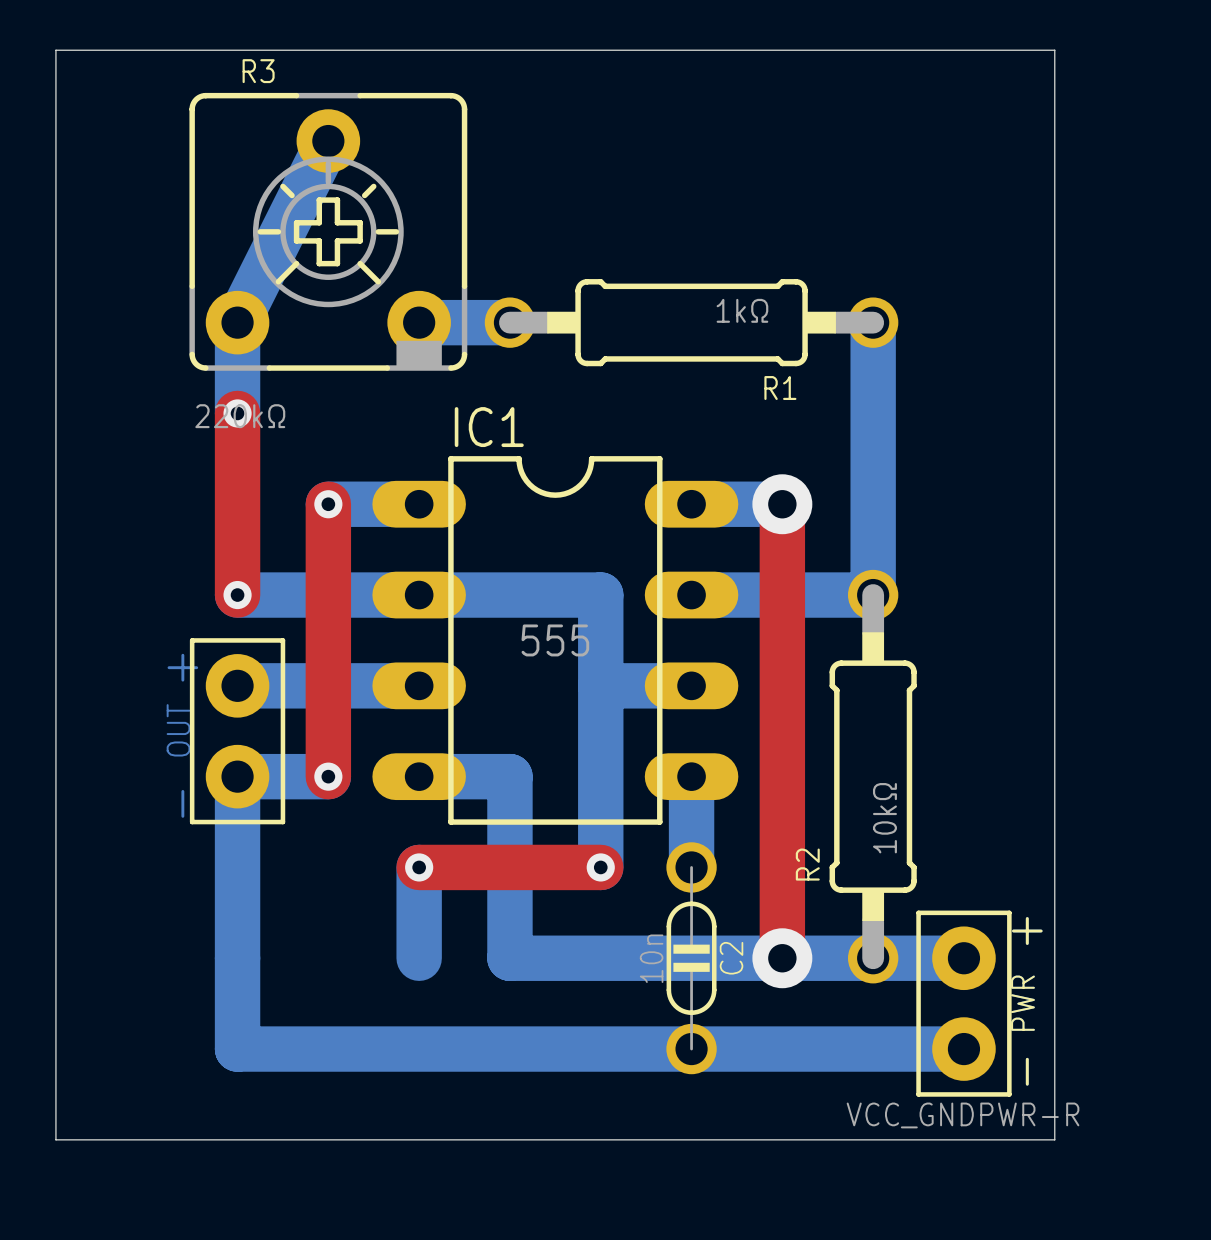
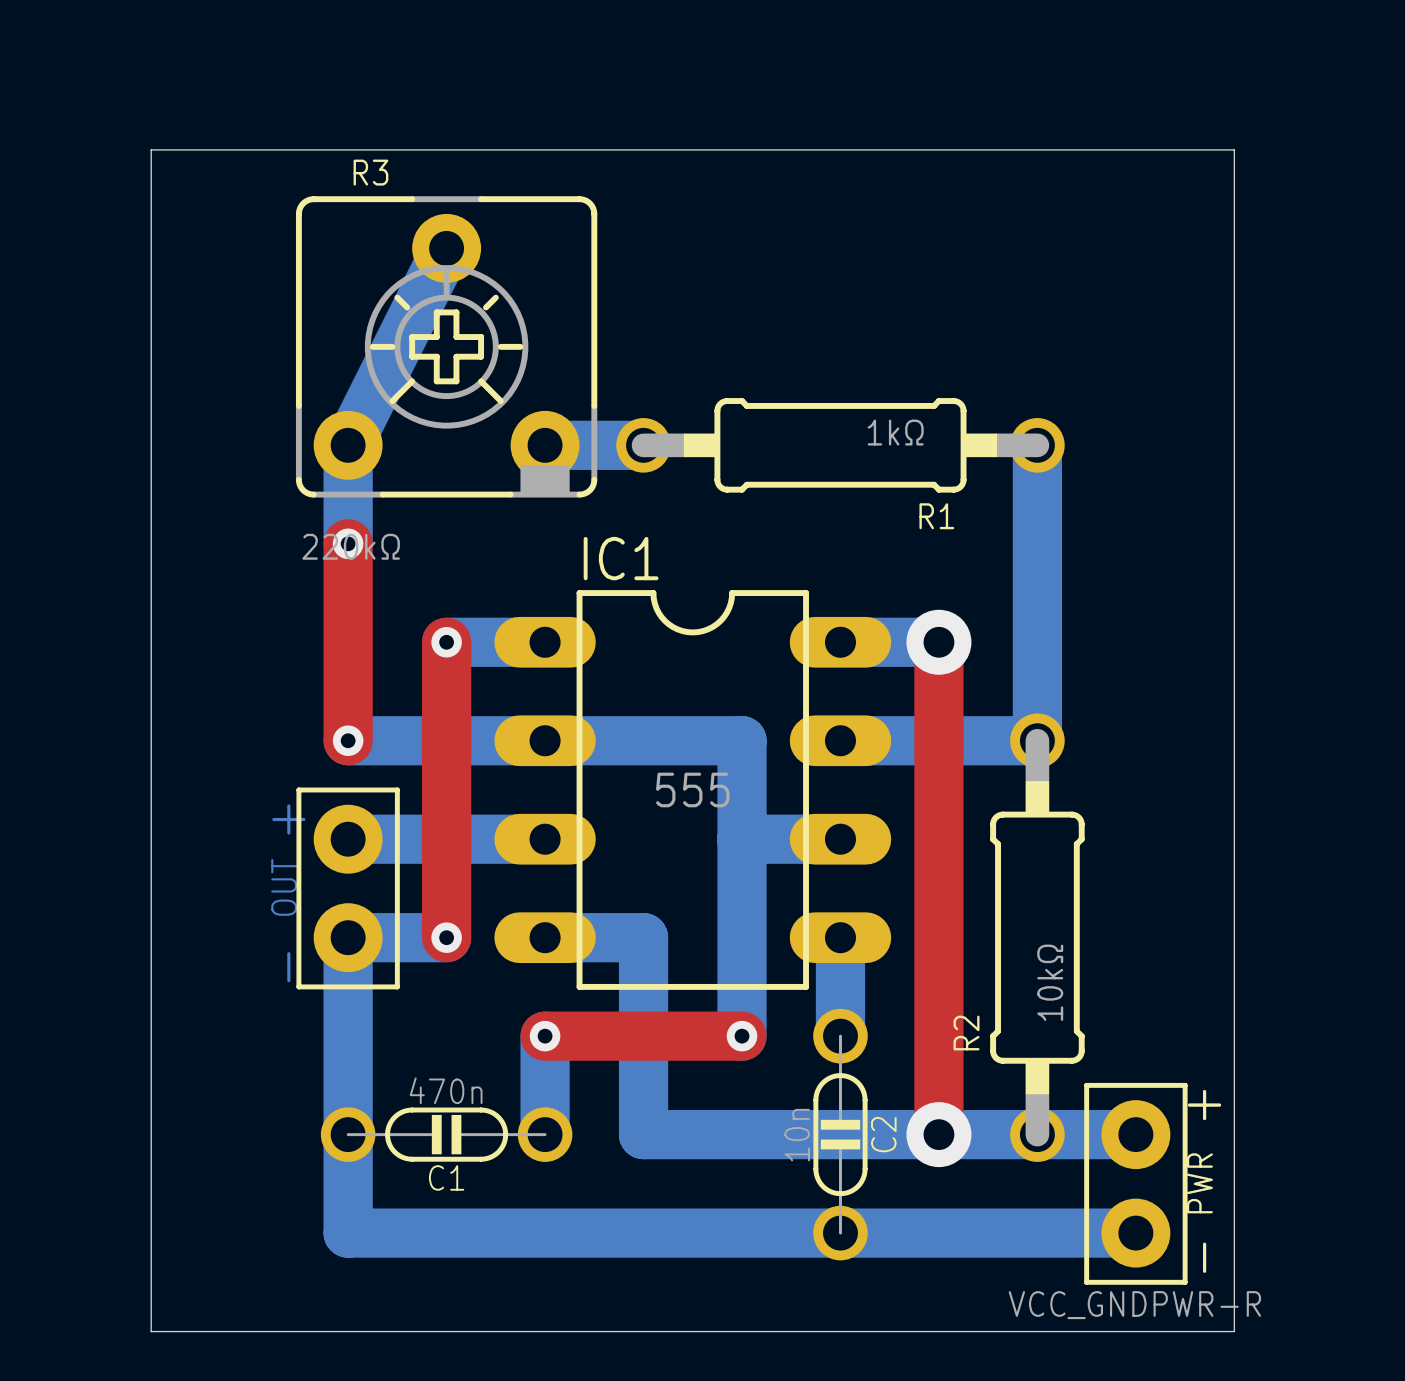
C1: none -> 470n (446, 1134)

